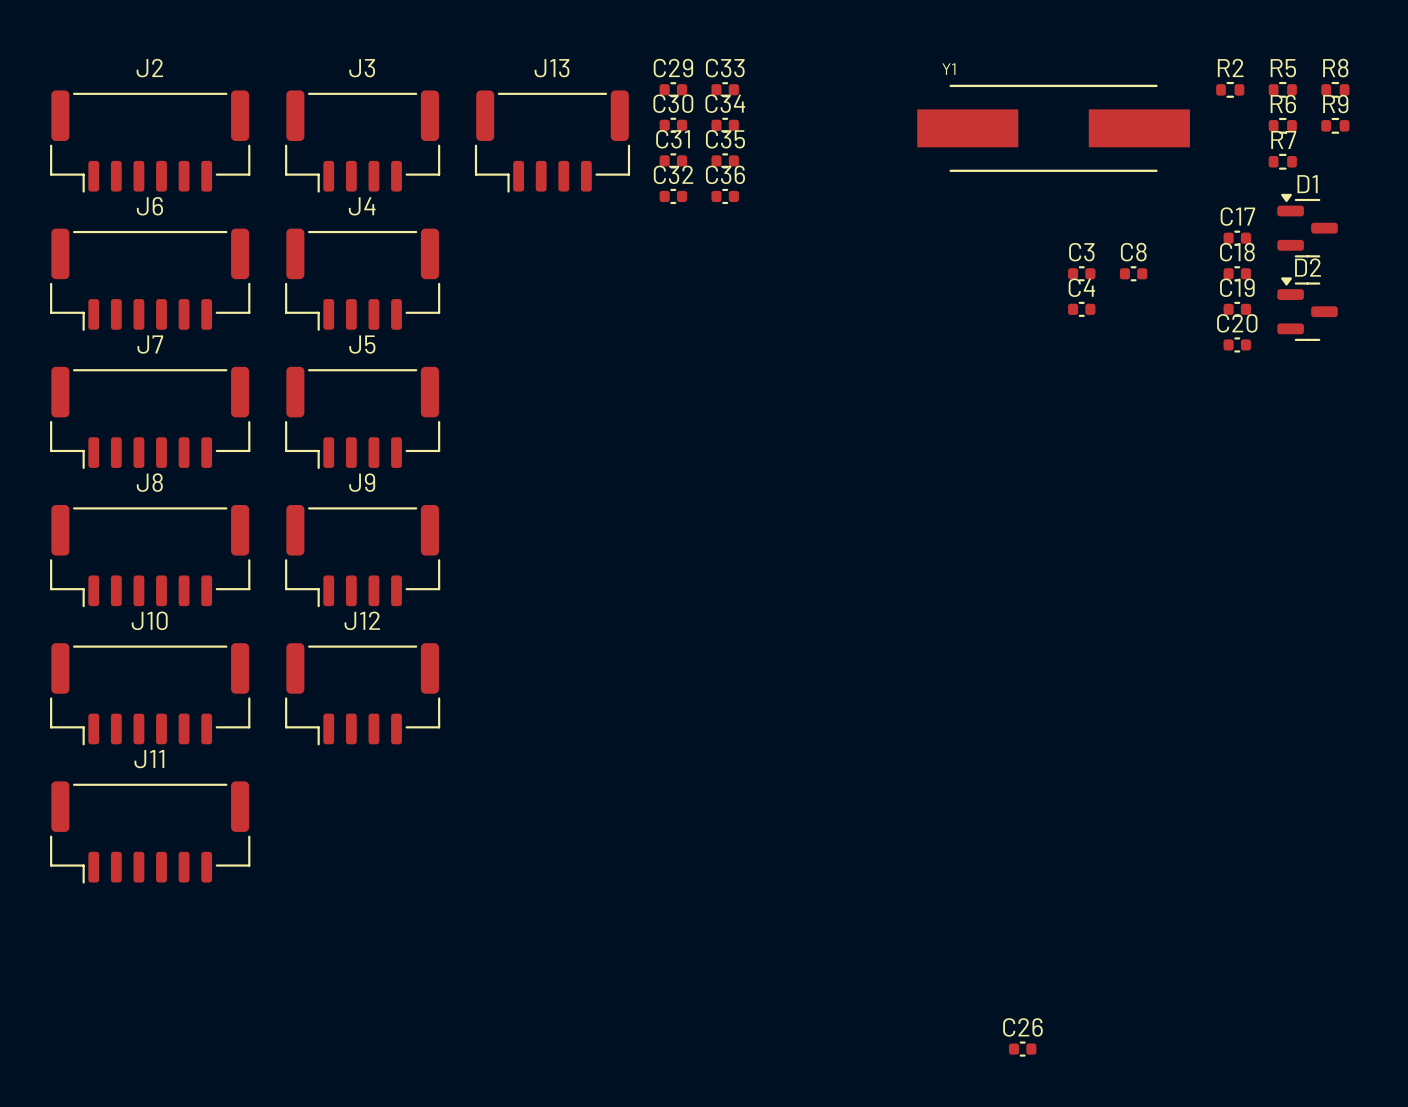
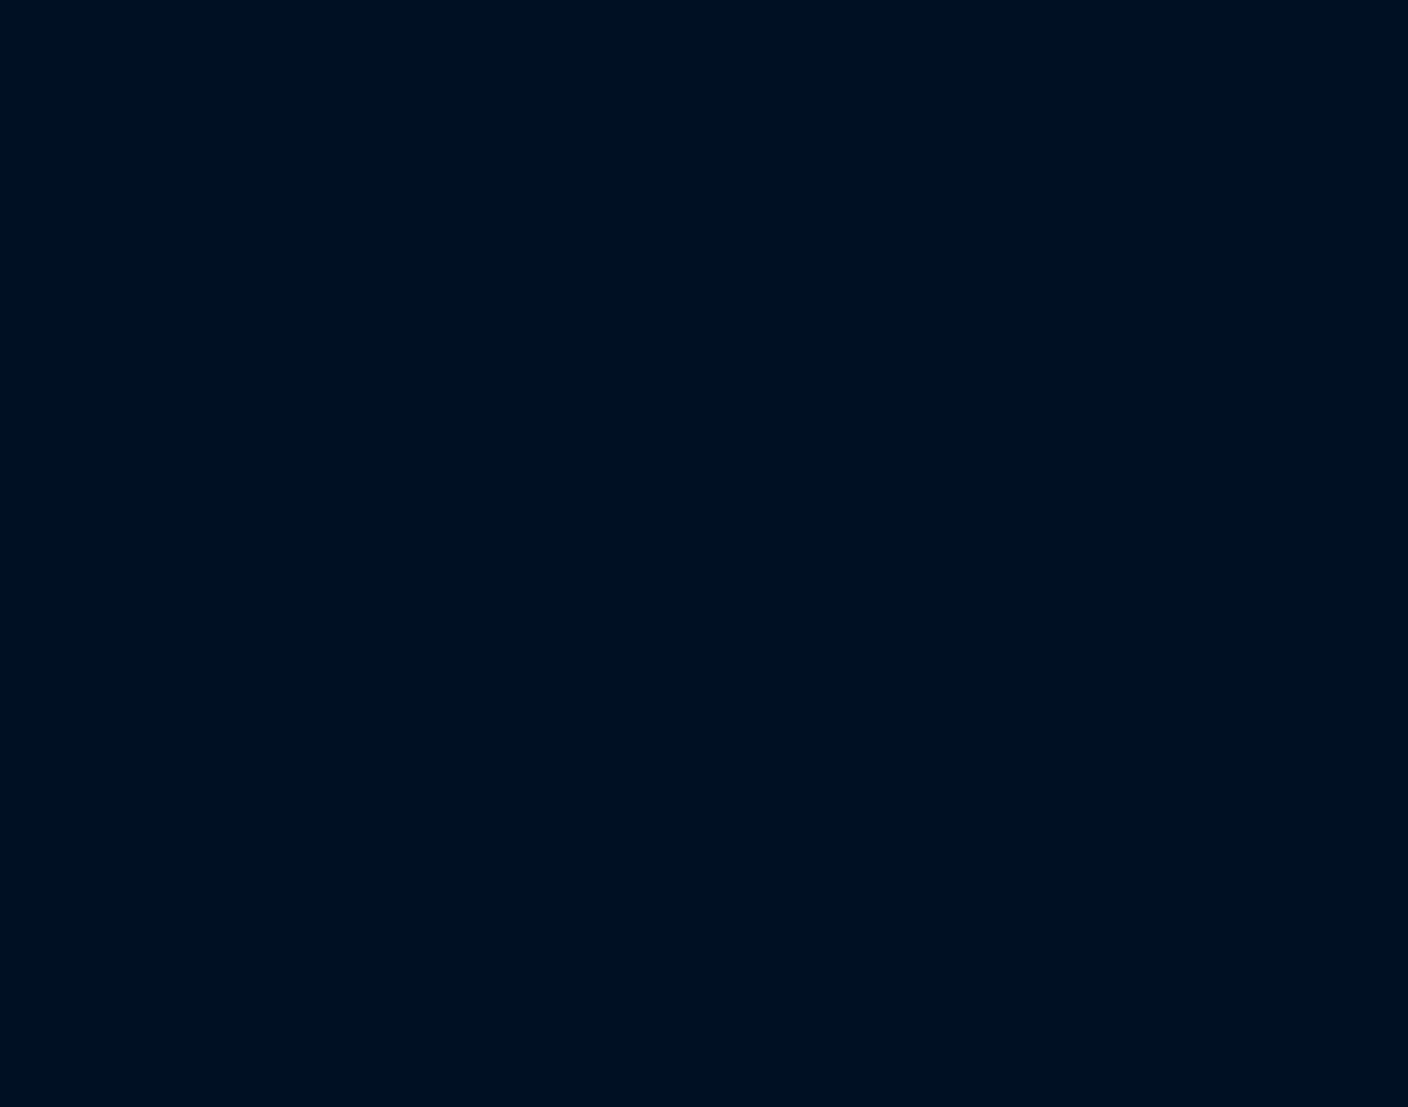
C29: (673, 89) -> none
C33: (725, 89) -> none
R2: (1230, 89) -> none
R5: (1282, 89) -> none
R8: (1335, 89) -> none
C30: (673, 125) -> none
C34: (725, 125) -> none
R6: (1282, 125) -> none
R9: (1335, 125) -> none
Y1: (1053, 128) -> none
J2: (150, 141) -> none
J3: (362, 141) -> none
J13: (552, 141) -> none
C31: (673, 160) -> none
C35: (725, 160) -> none
R7: (1282, 161) -> none
C32: (673, 196) -> none
C36: (725, 196) -> none
D1: (1307, 225) -> none
C17: (1237, 238) -> none
C3: (1081, 273) -> none
C8: (1133, 273) -> none
C18: (1237, 273) -> none
J6: (150, 279) -> none
J4: (362, 279) -> none
C4: (1081, 309) -> none
C19: (1237, 309) -> none
D2: (1307, 309) -> none
C20: (1237, 344) -> none
J7: (150, 417) -> none
J5: (362, 417) -> none
J8: (150, 556) -> none
J9: (362, 556) -> none
J10: (150, 694) -> none
J12: (362, 694) -> none
J11: (150, 832) -> none
C26: (1022, 1049) -> none

